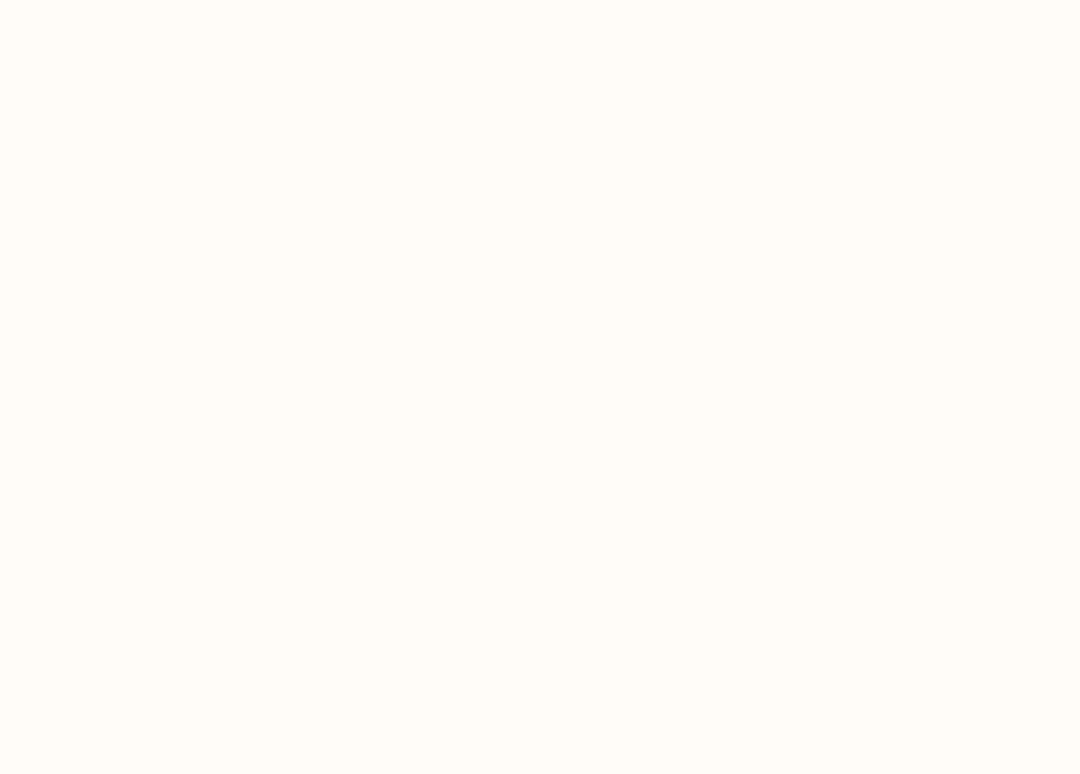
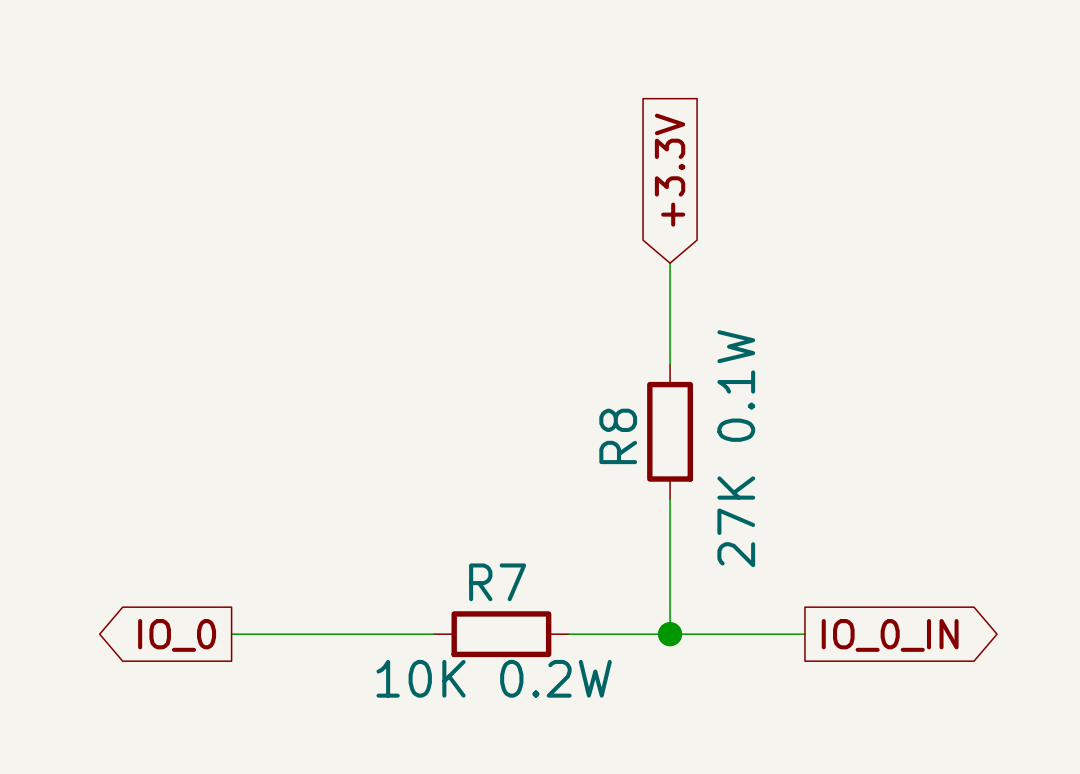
global label: none -> +3.3V (670, 170)
wire: none -> (670, 263) (670, 364)
R8: none -> 27K 0.1W (670, 431)
wire: none -> (670, 499) (670, 634)
wire: none -> (231, 634) (433, 634)
R7: none -> 10K 0.2W (501, 634)
wire: none -> (568, 634) (804, 634)
junction: none -> (670, 634)
global label: none -> IO_0 (177, 635)
global label: none -> IO_0_IN (890, 635)

